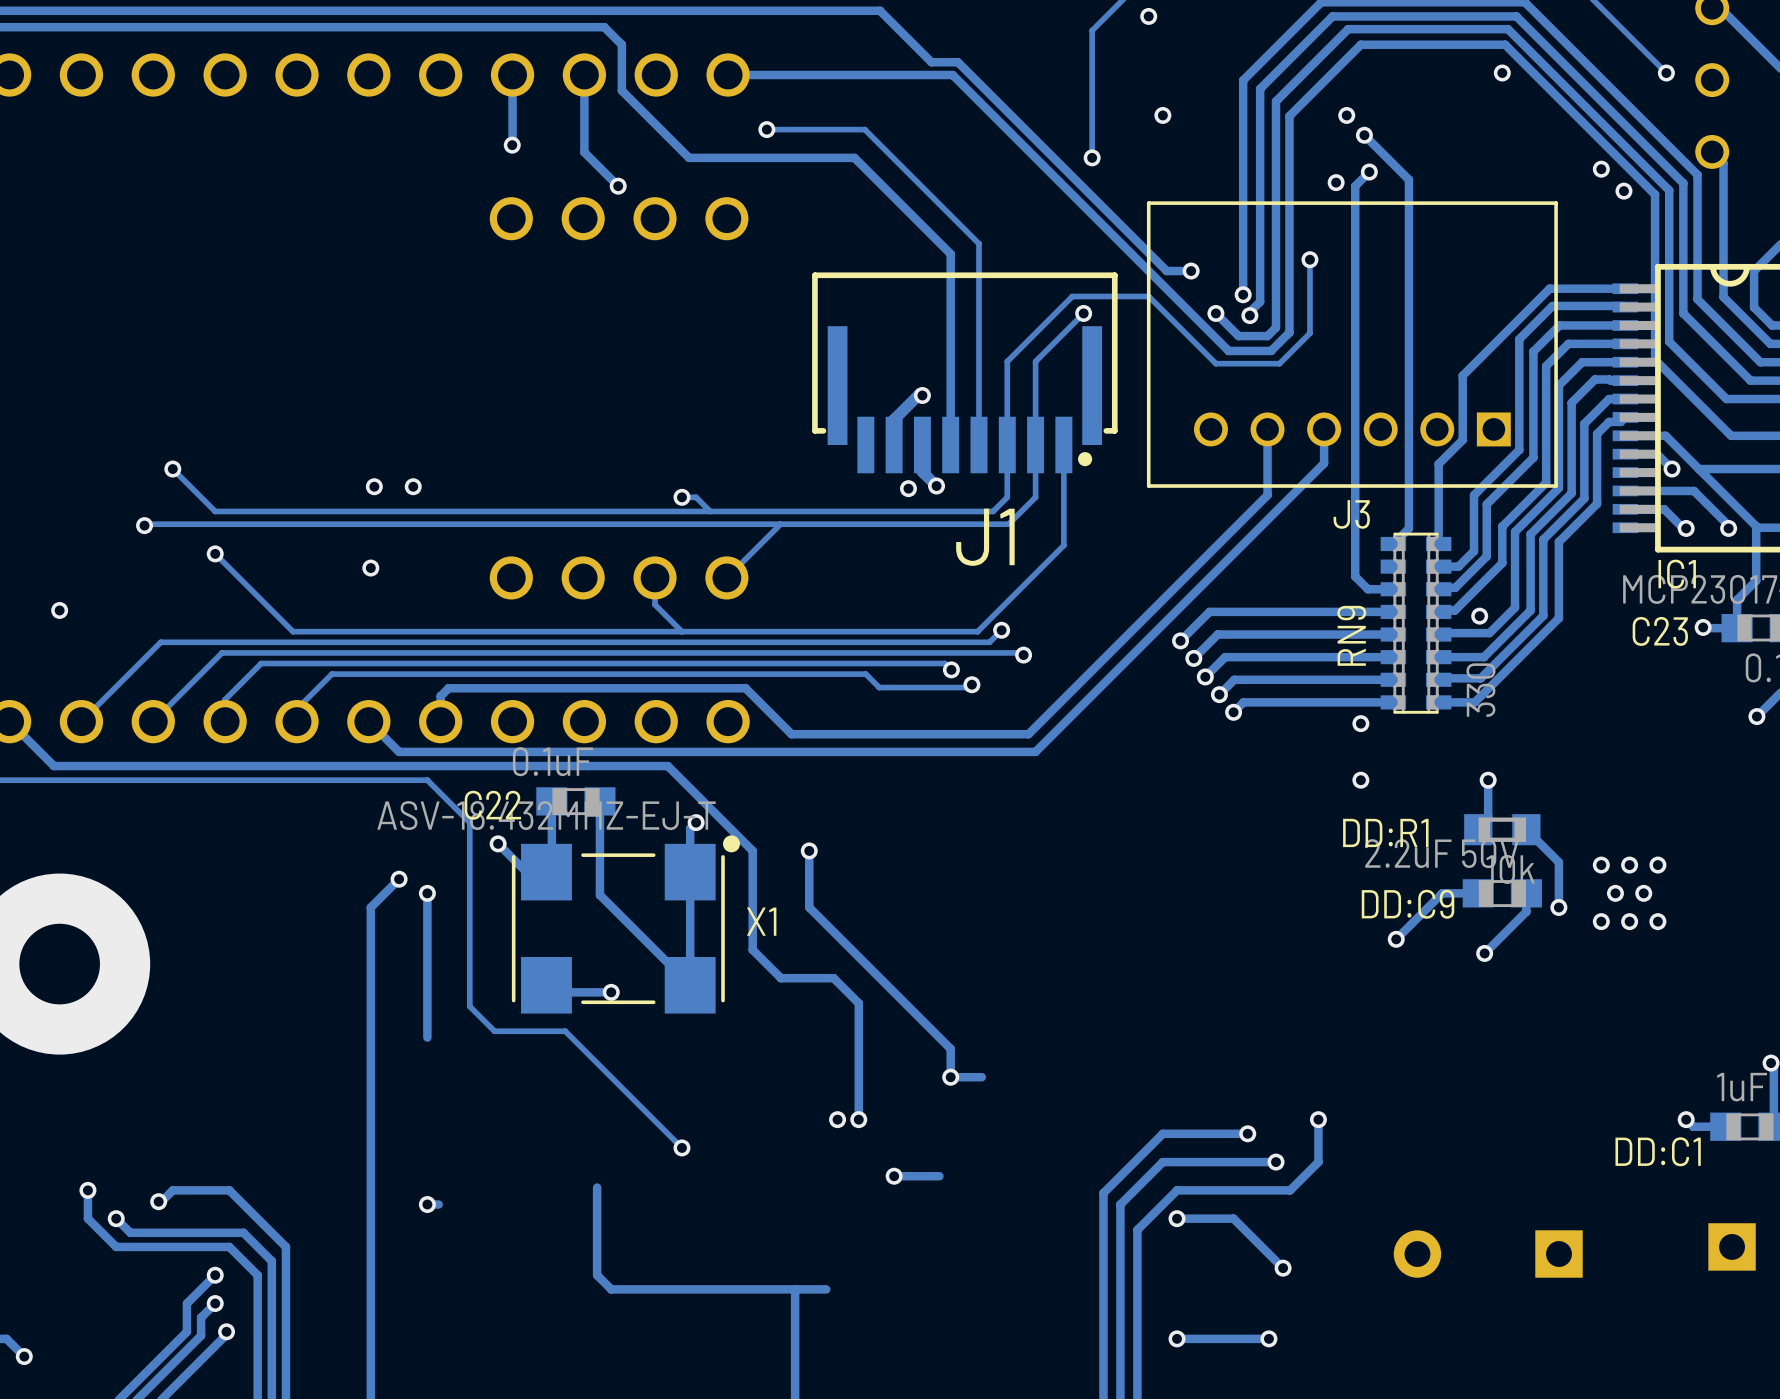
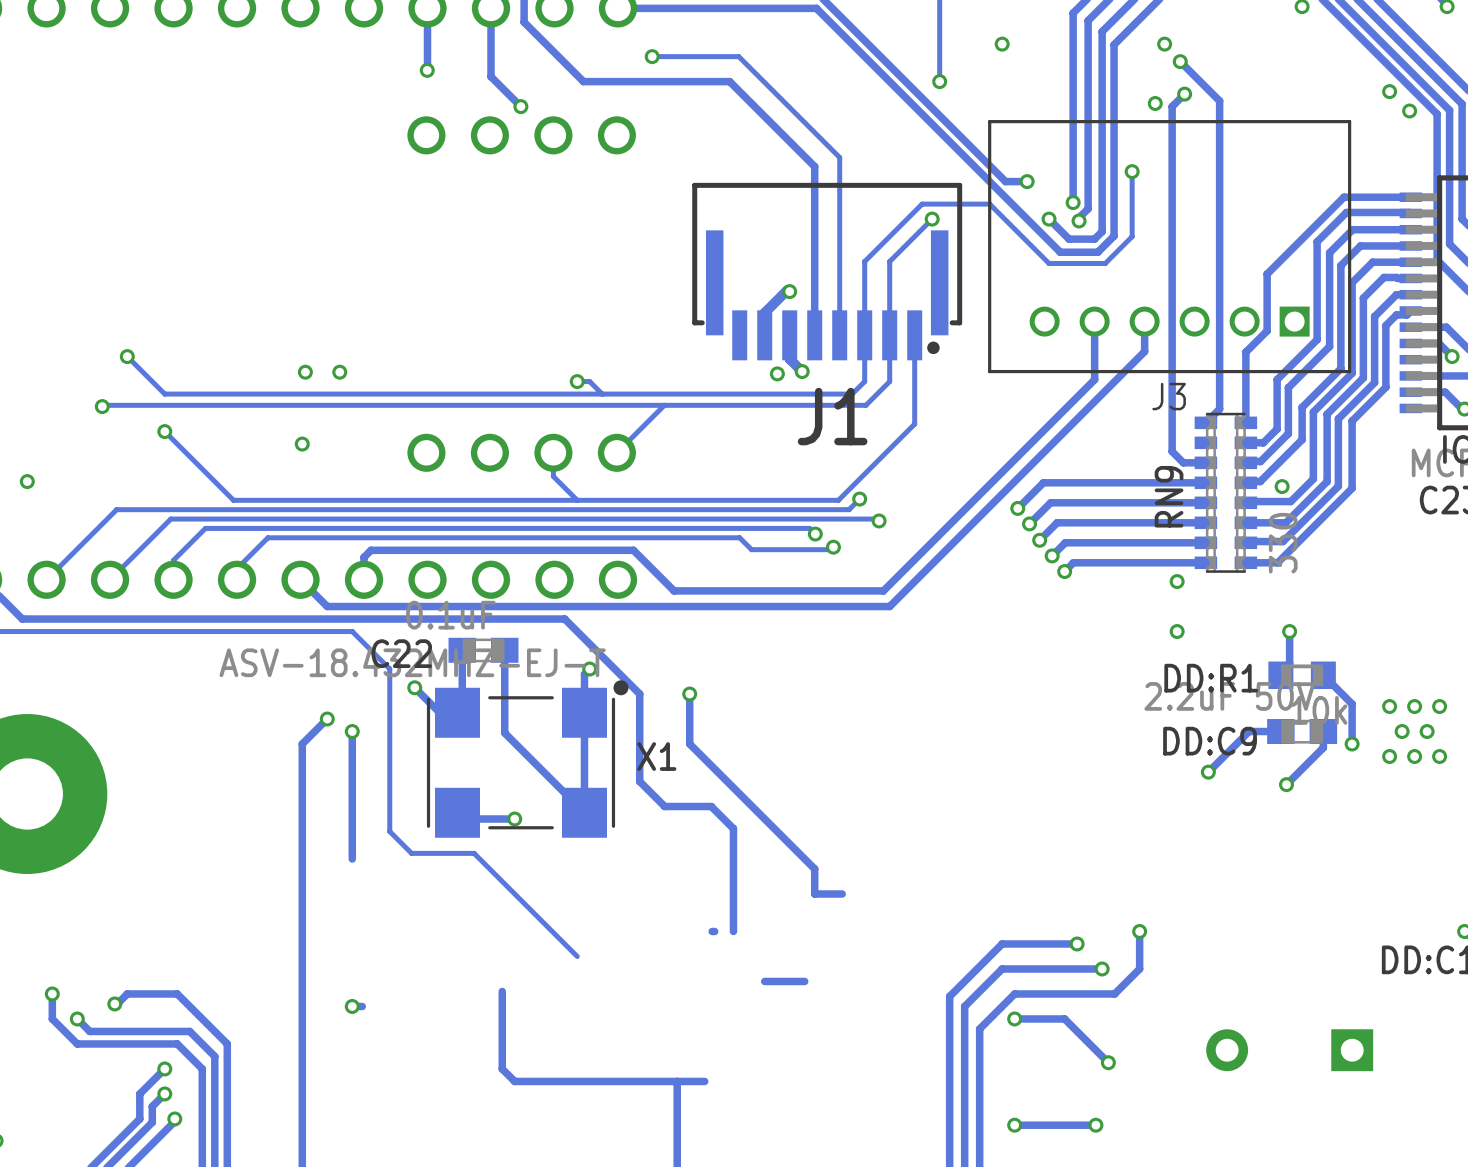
via: (950, 1077) -> none
via: (837, 1119) -> none
via: (858, 1119) -> none
via: (681, 1147) -> none
via: (894, 1176) -> none

